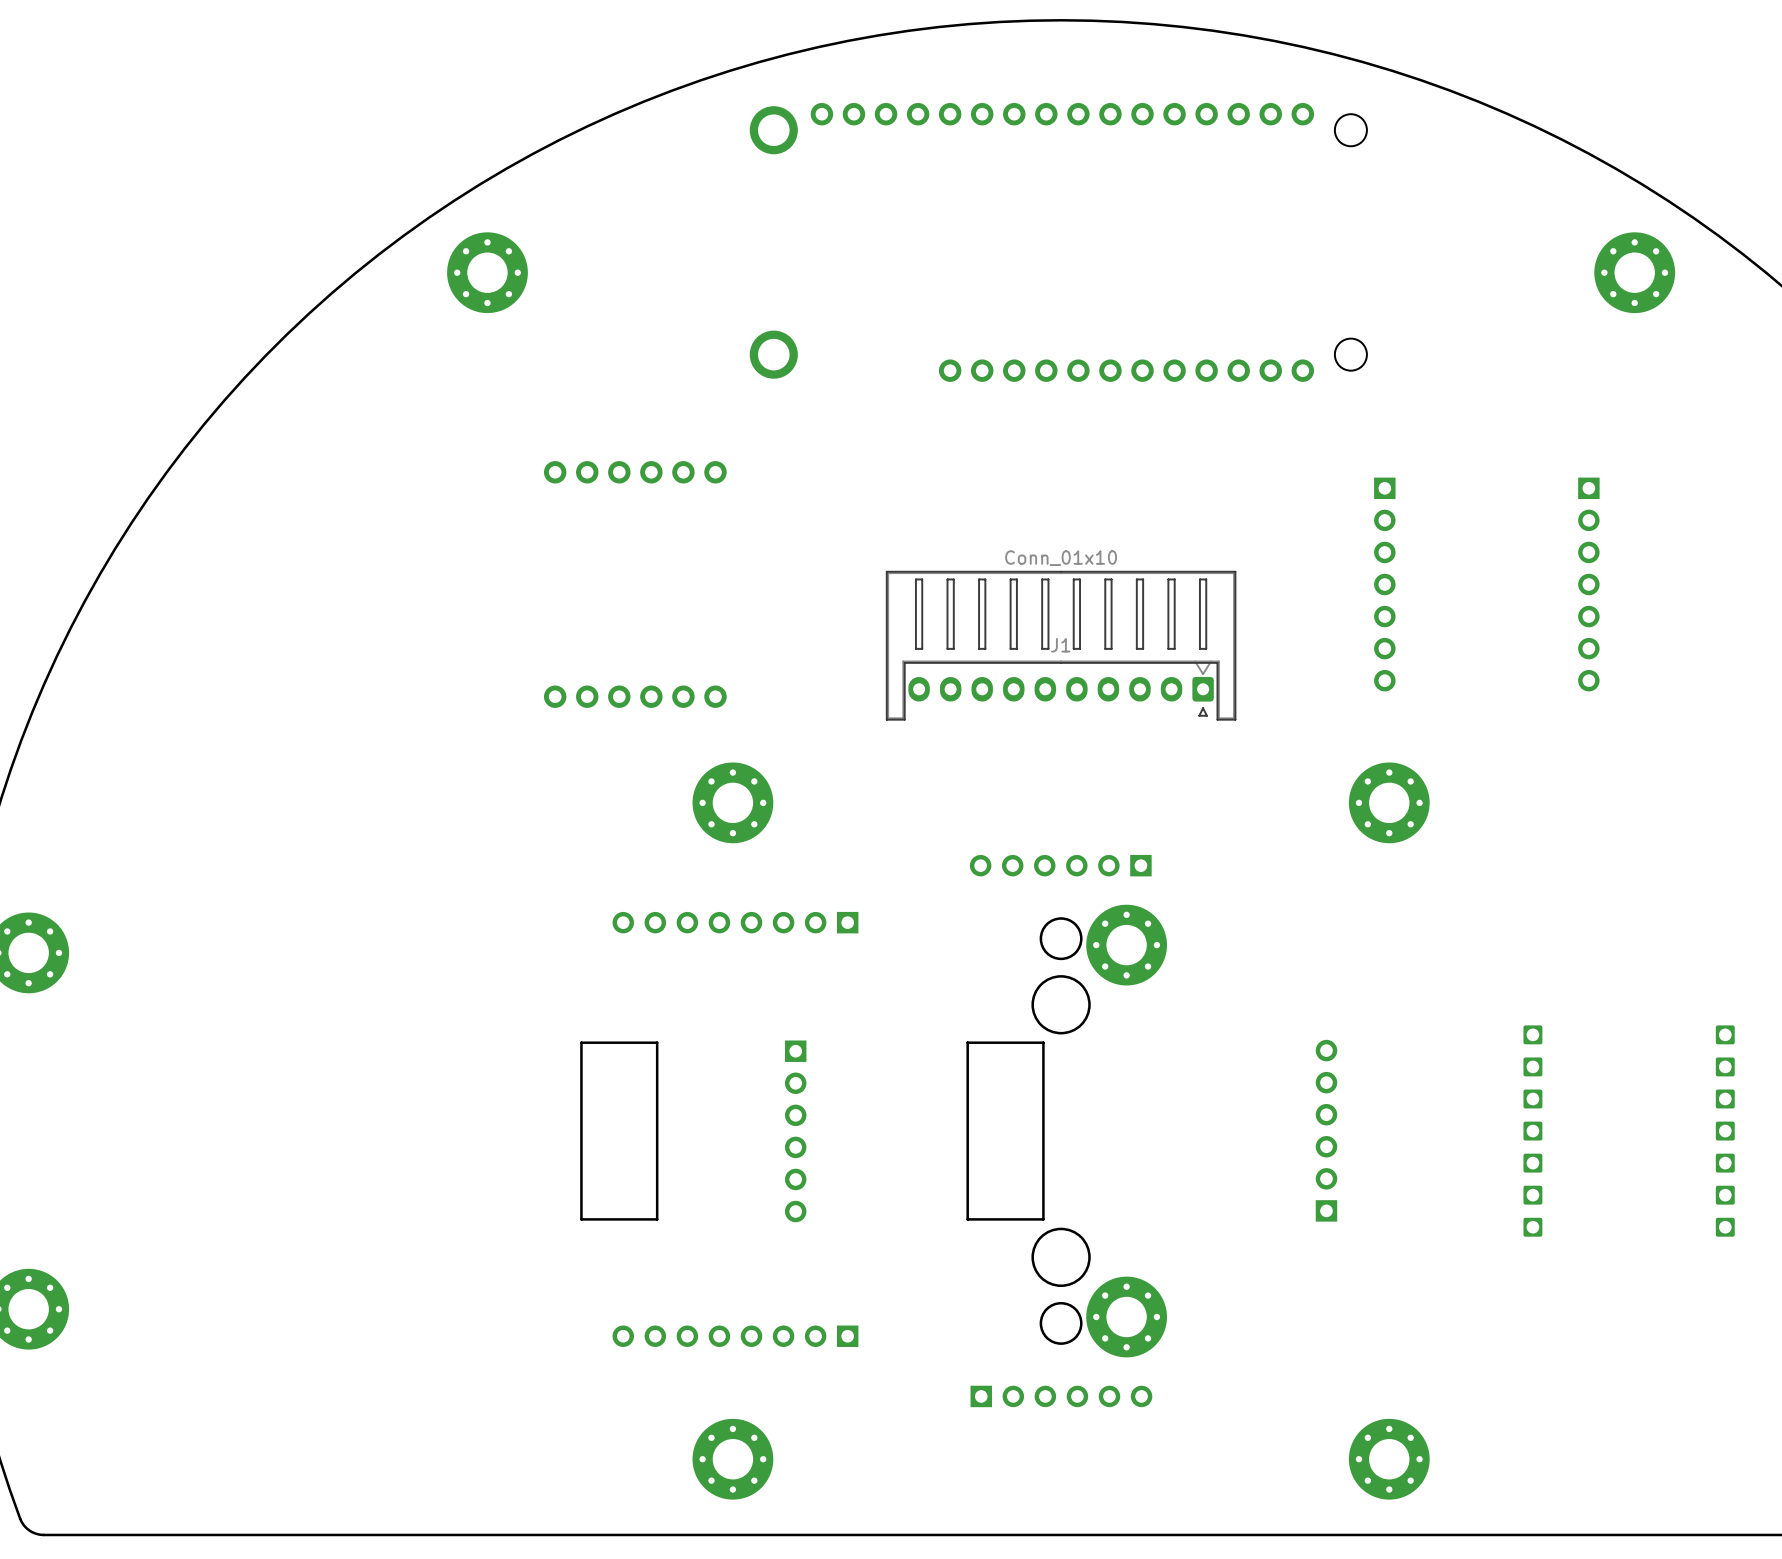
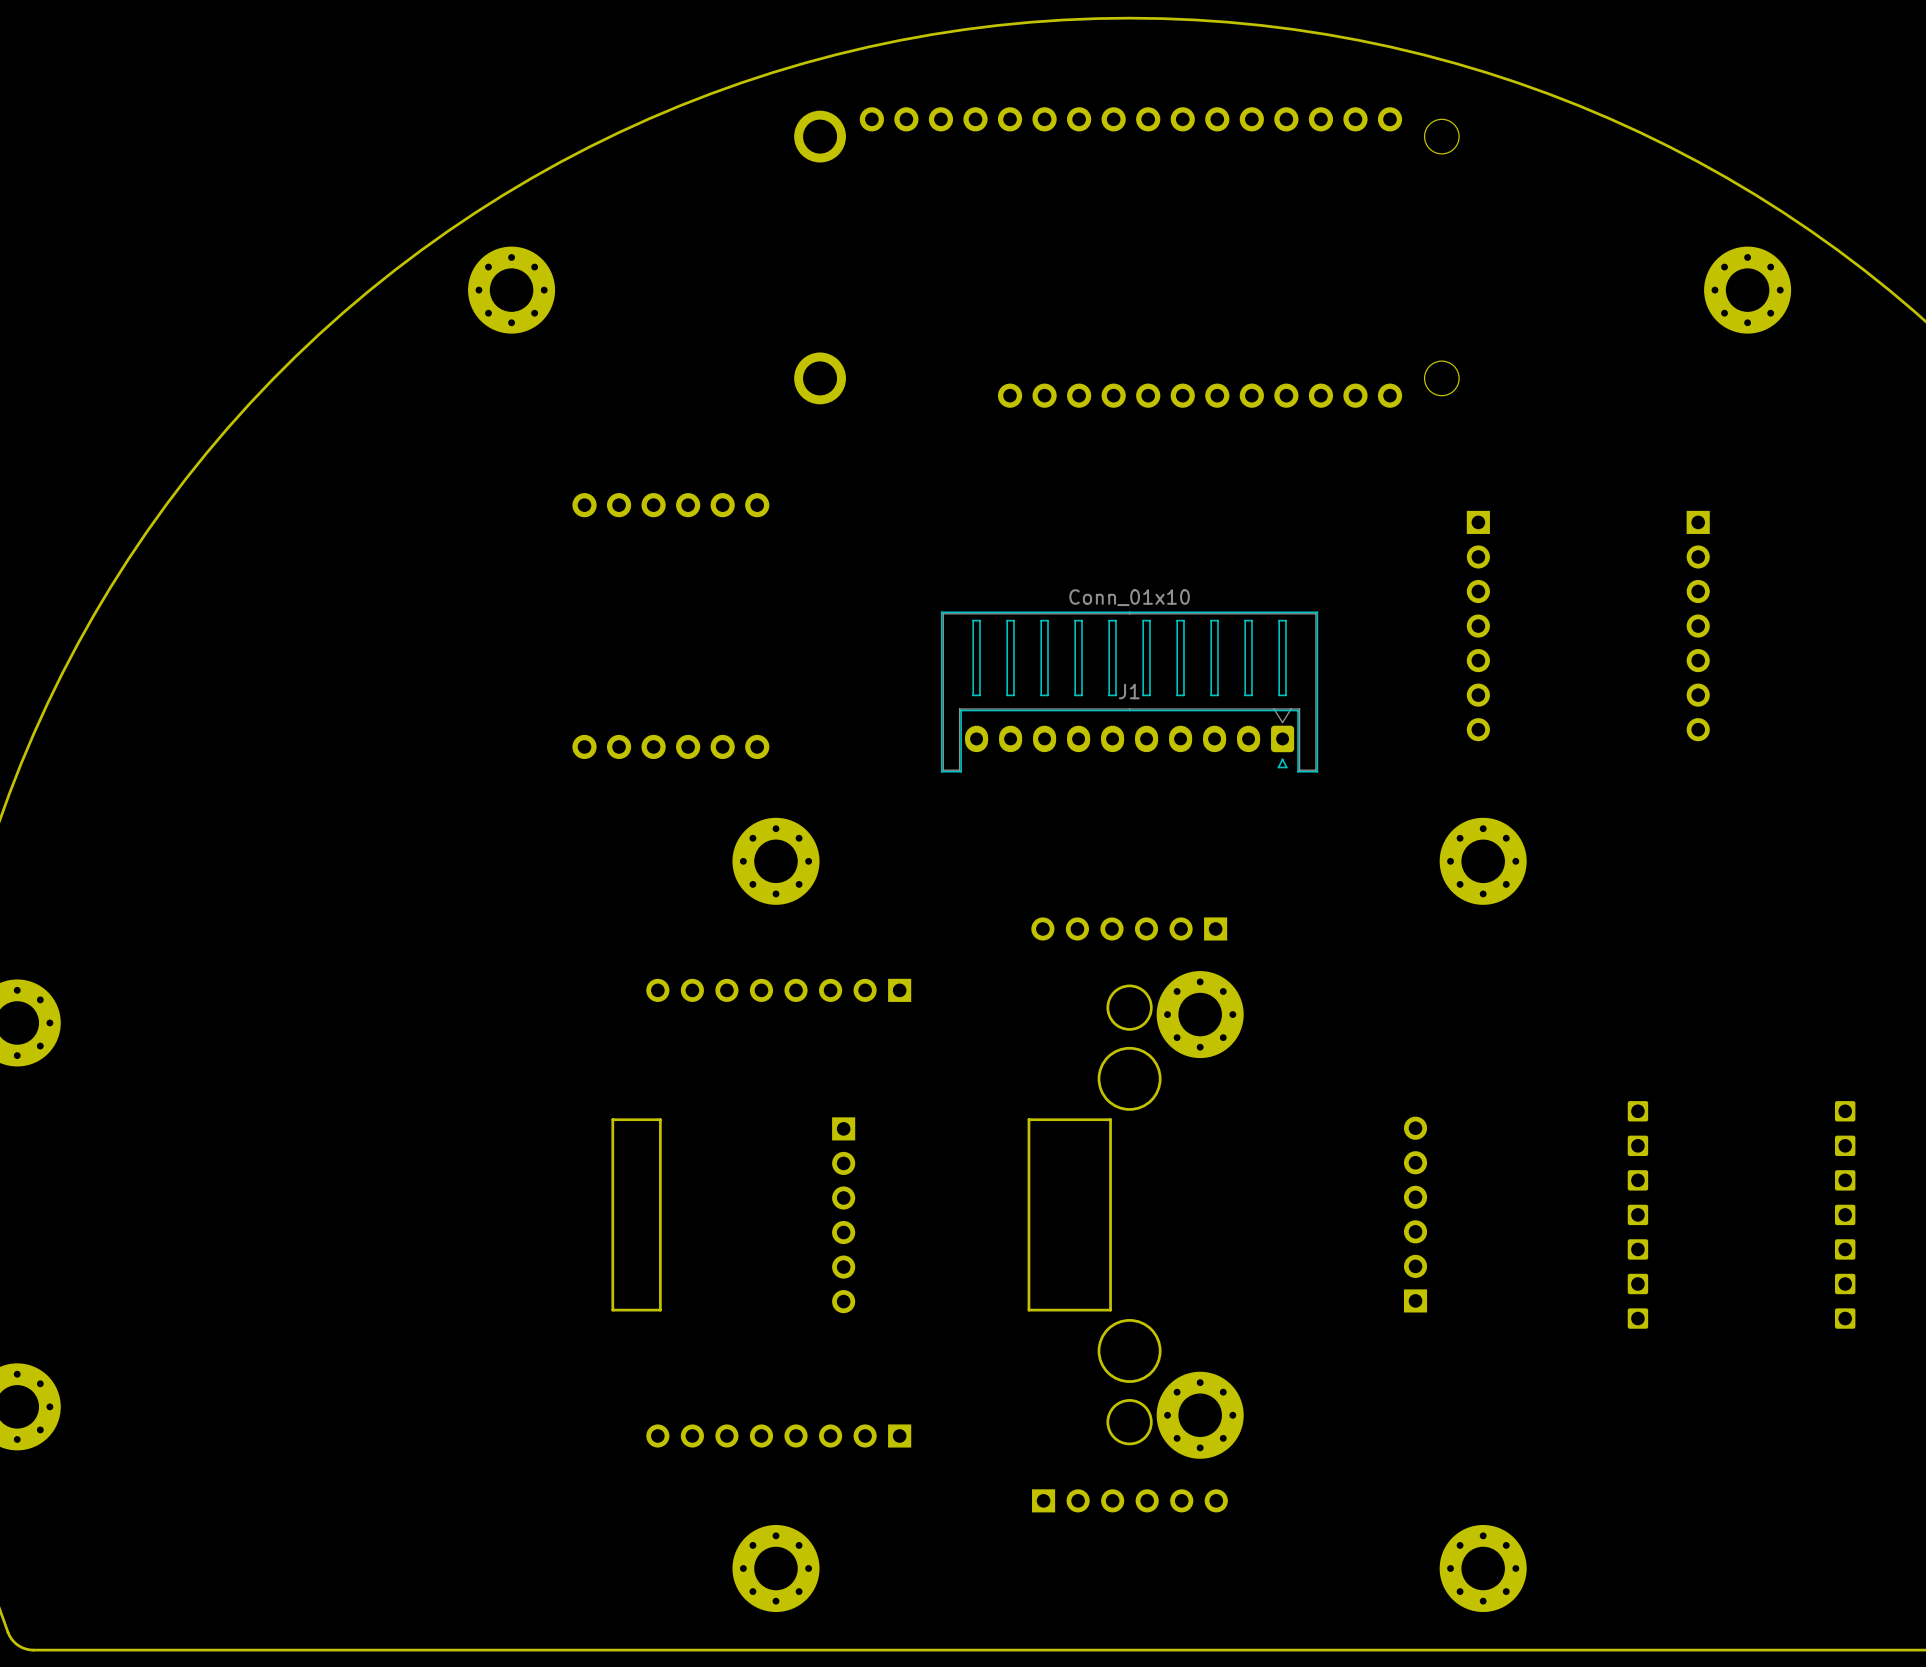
board edge: (625, 1042) (657, 1042) (657, 1219) (625, 1219) -> (660, 1119) (660, 1310)

